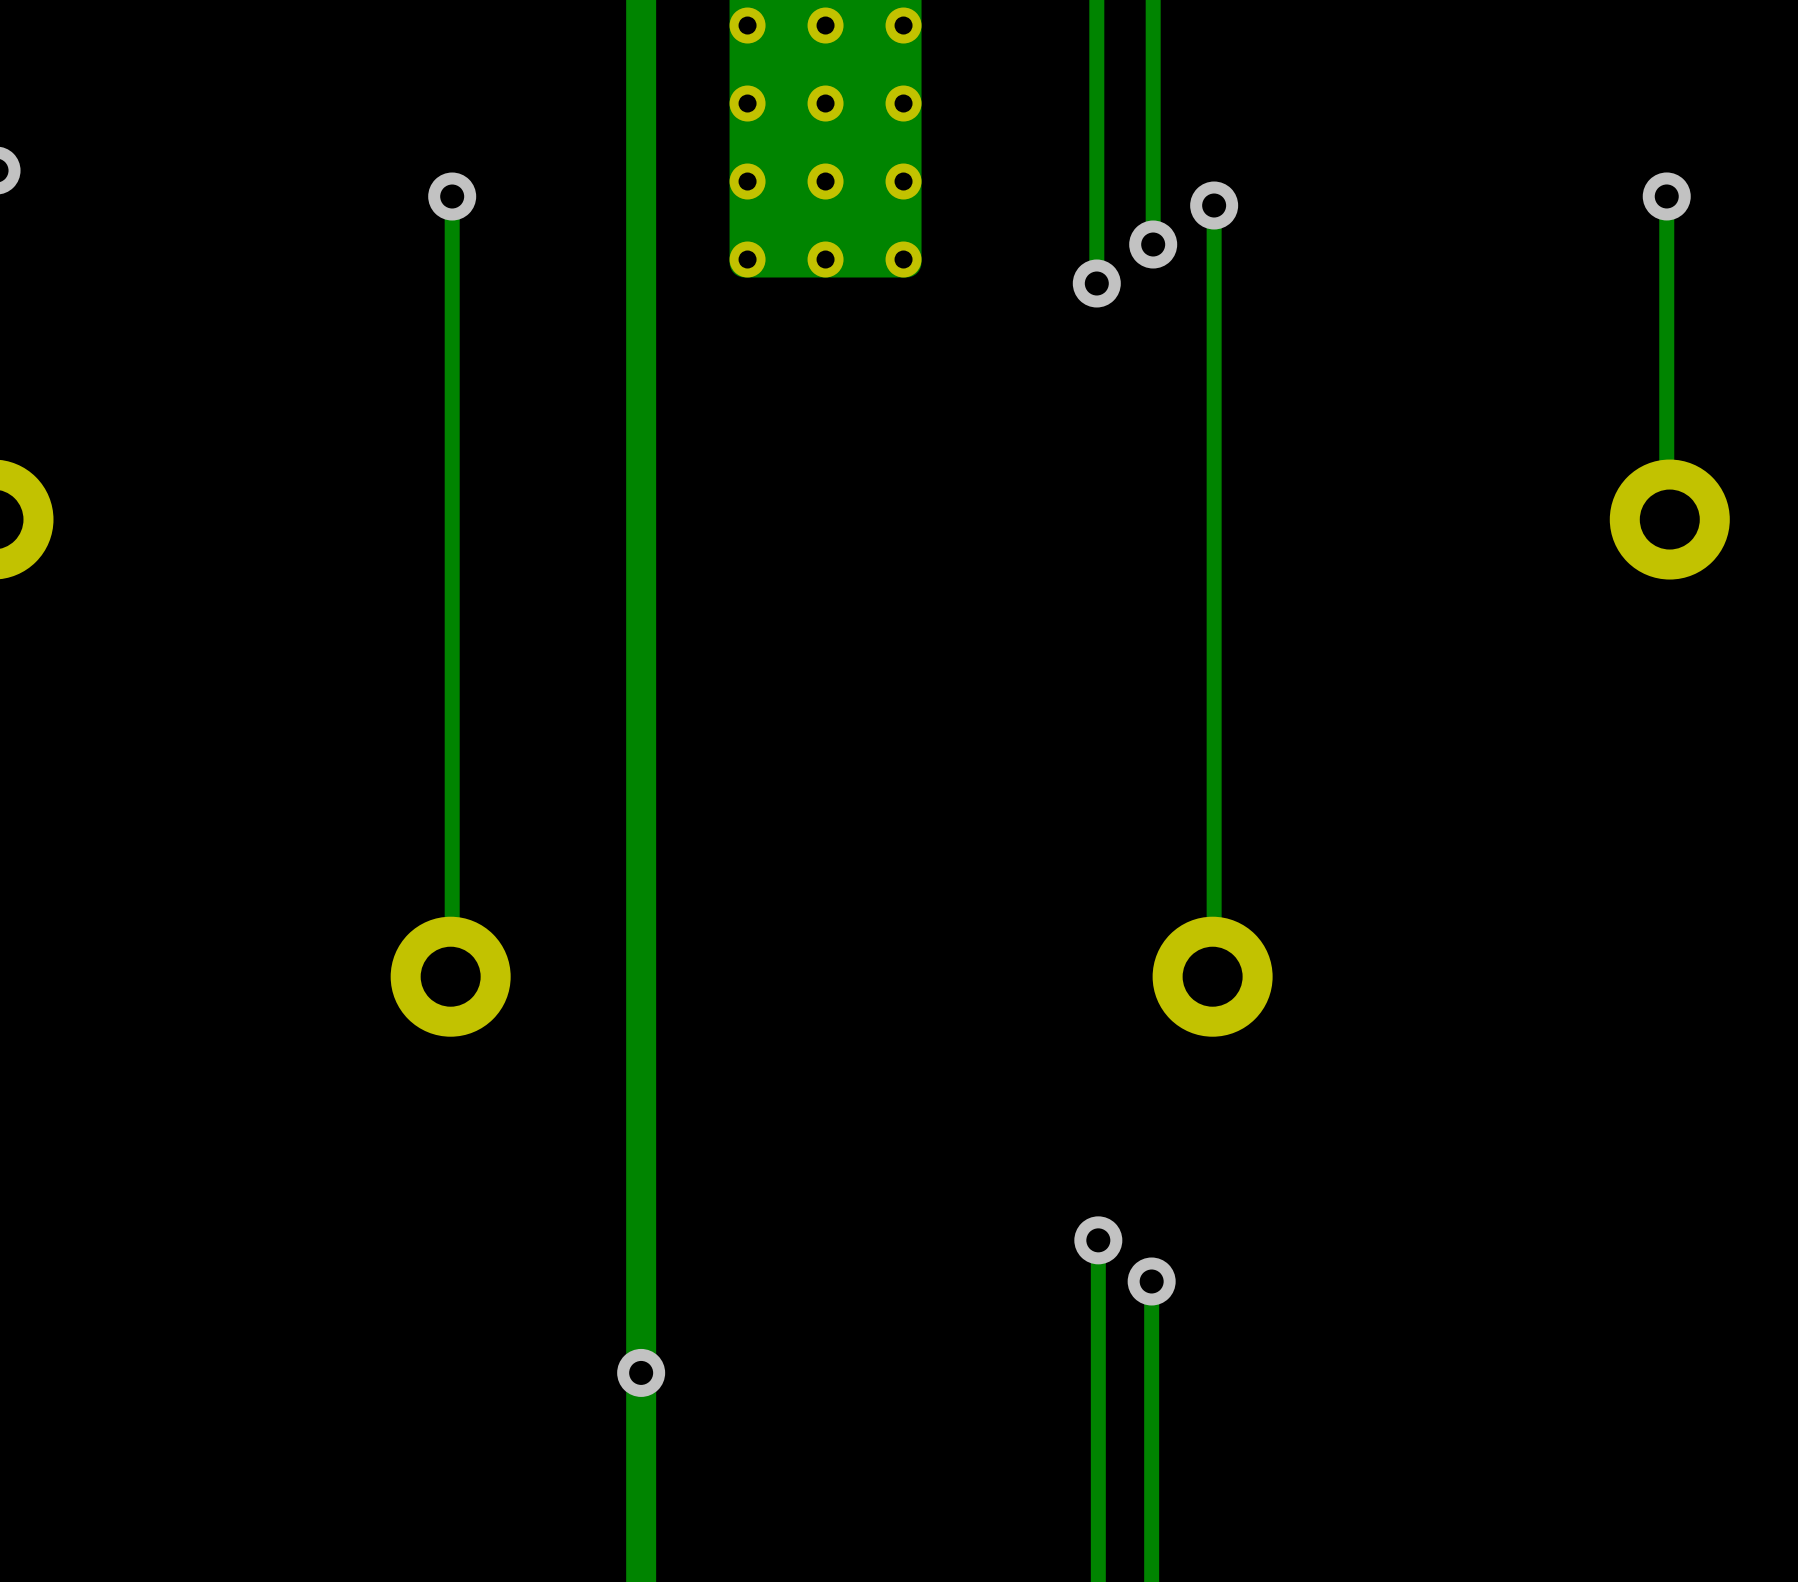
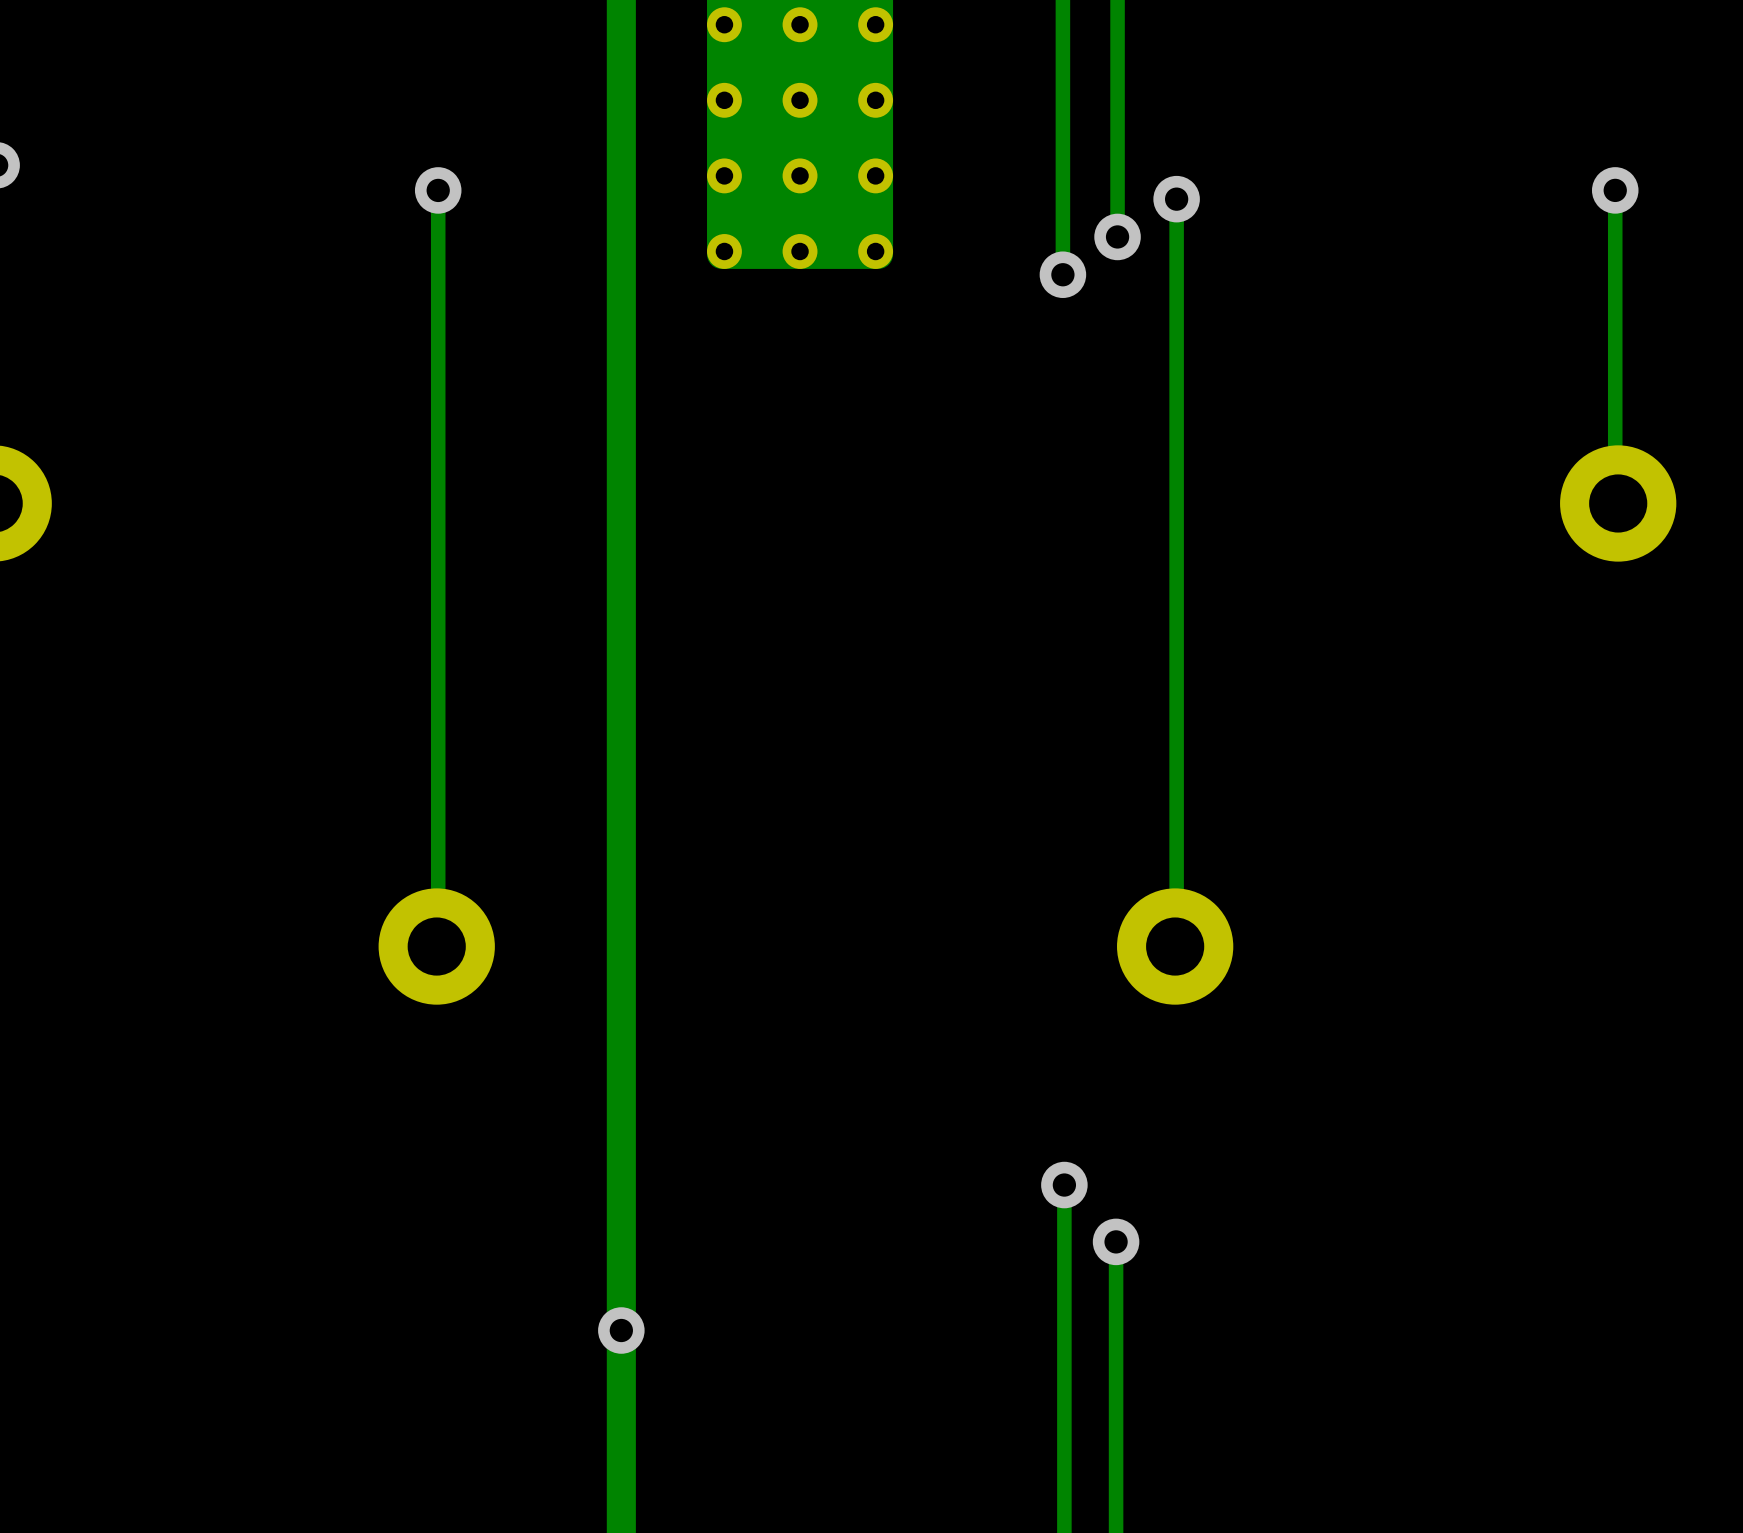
via position: (1098, 1240) -> (1064, 1185)

